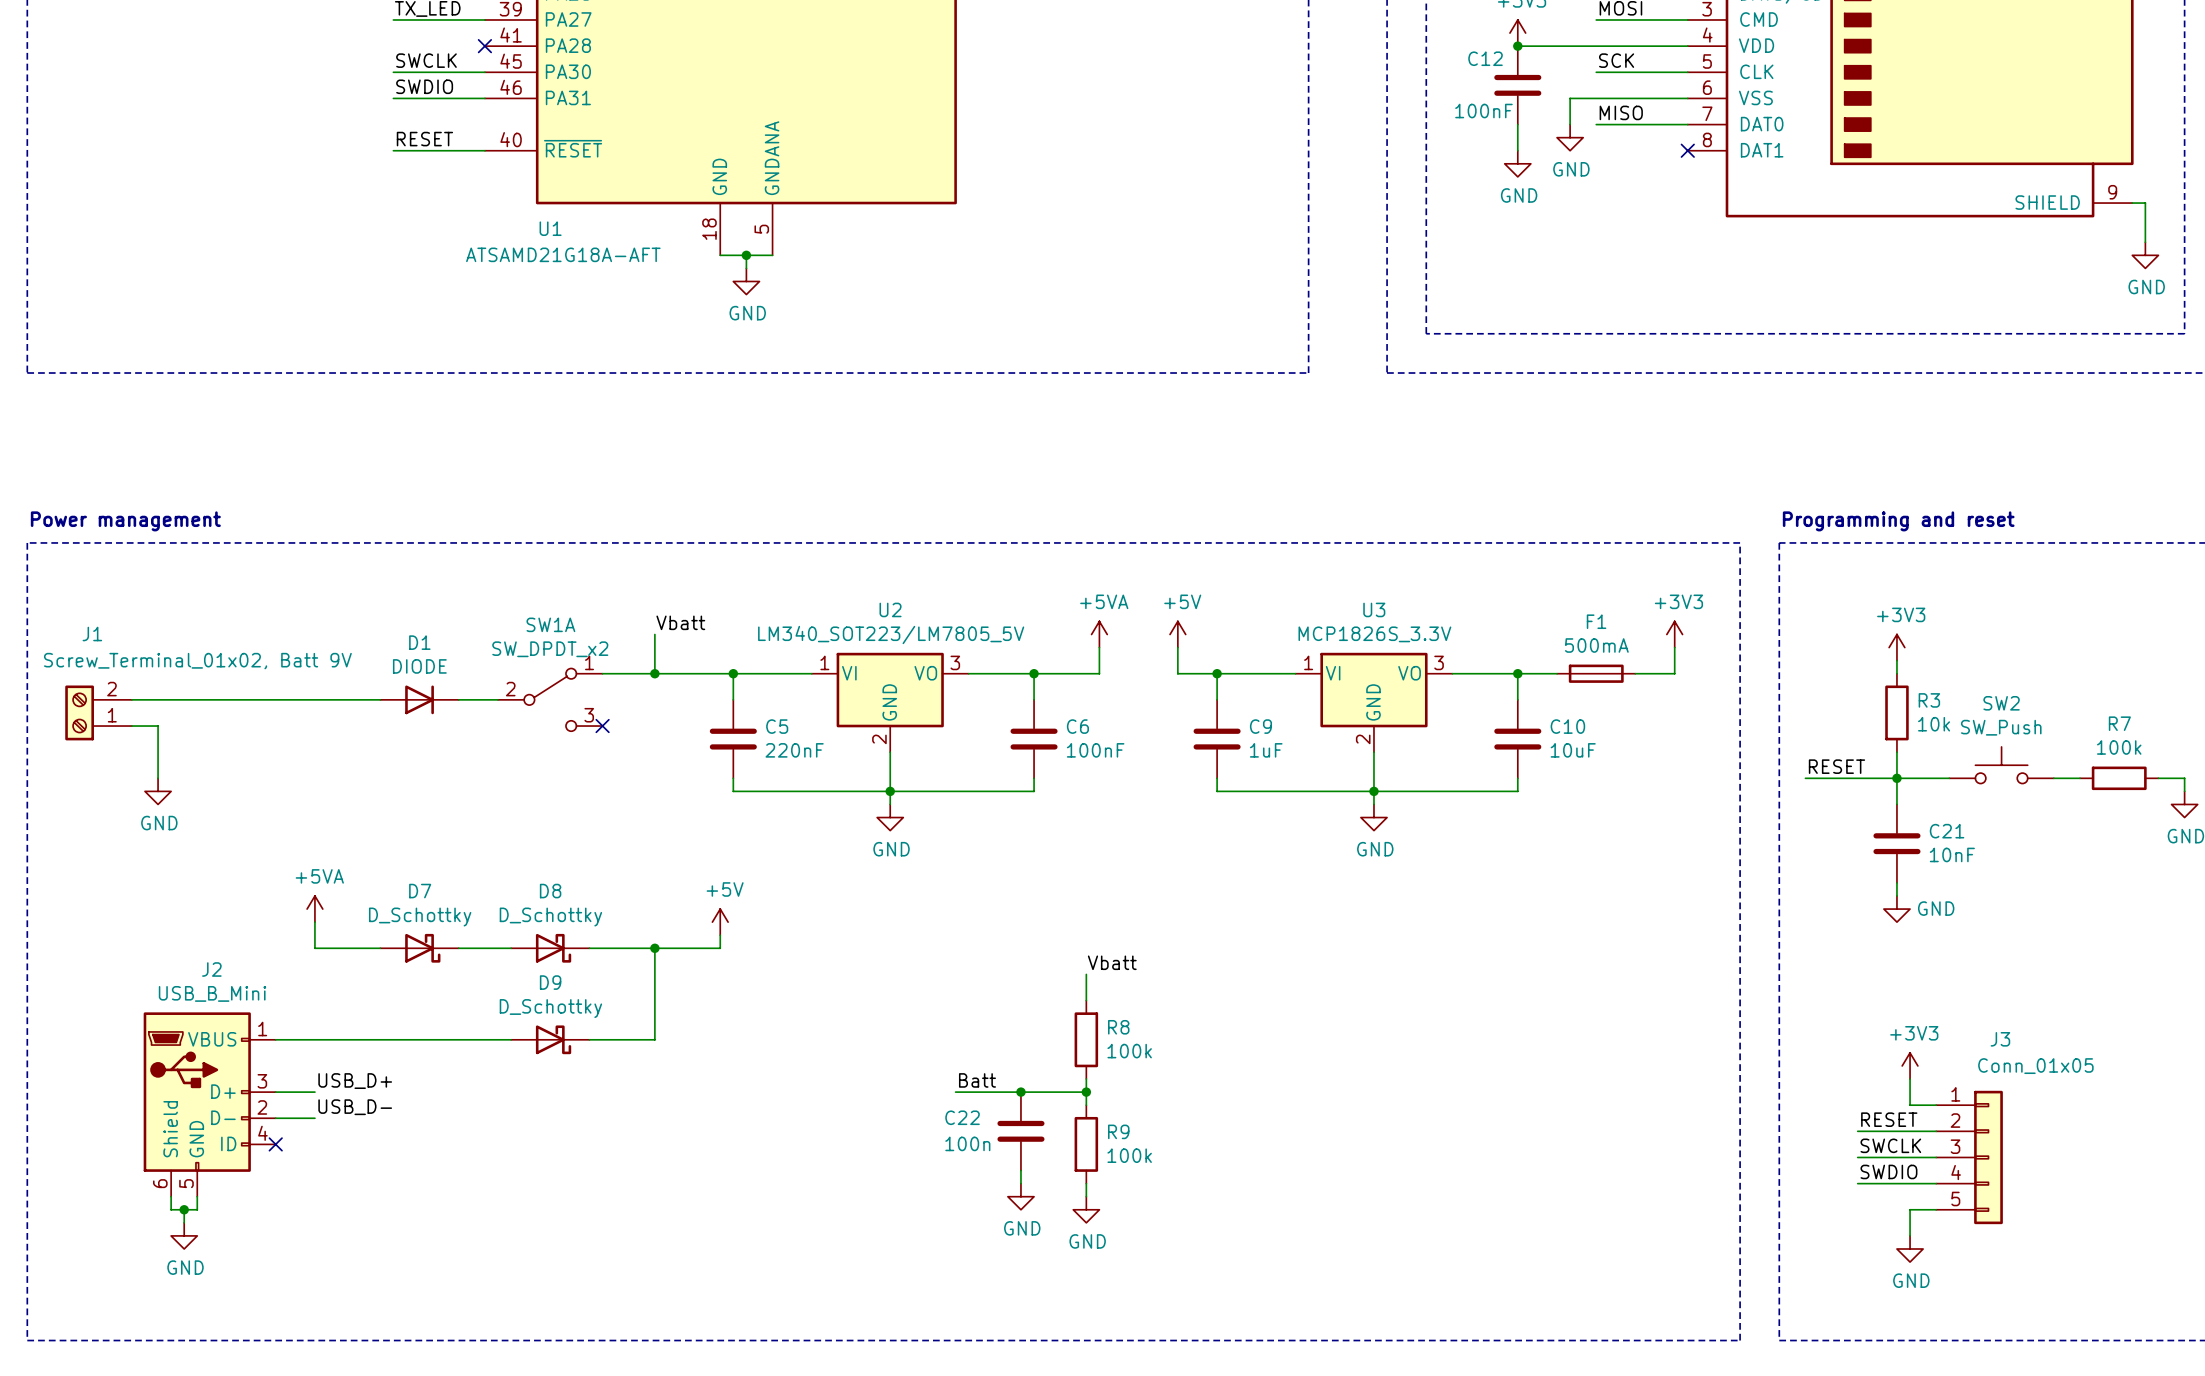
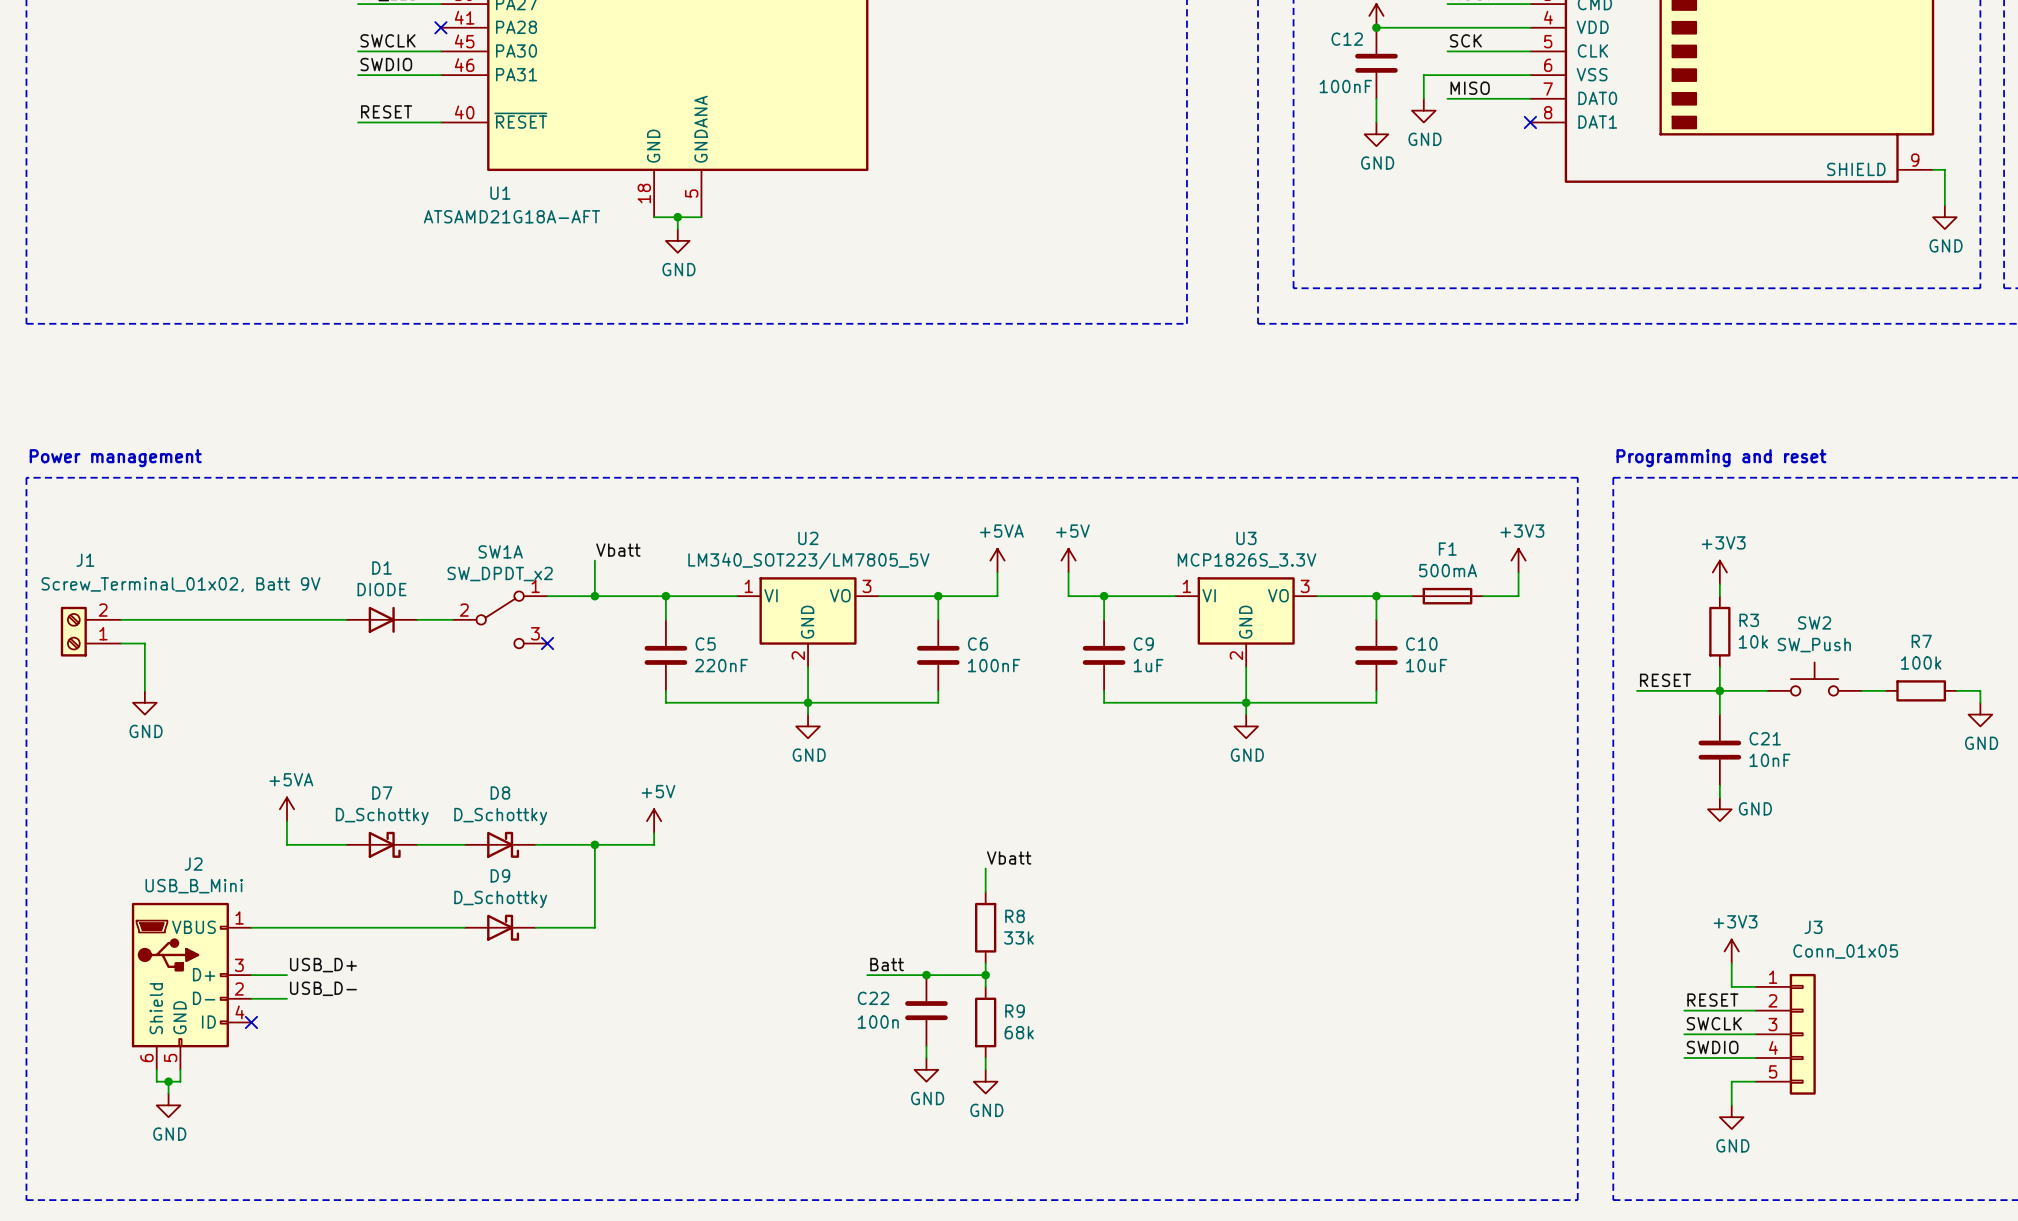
R8 value: 100k (1129, 1051) -> 33k (1018, 937)
R9 value: 100k (1129, 1155) -> 68k (1019, 1032)

